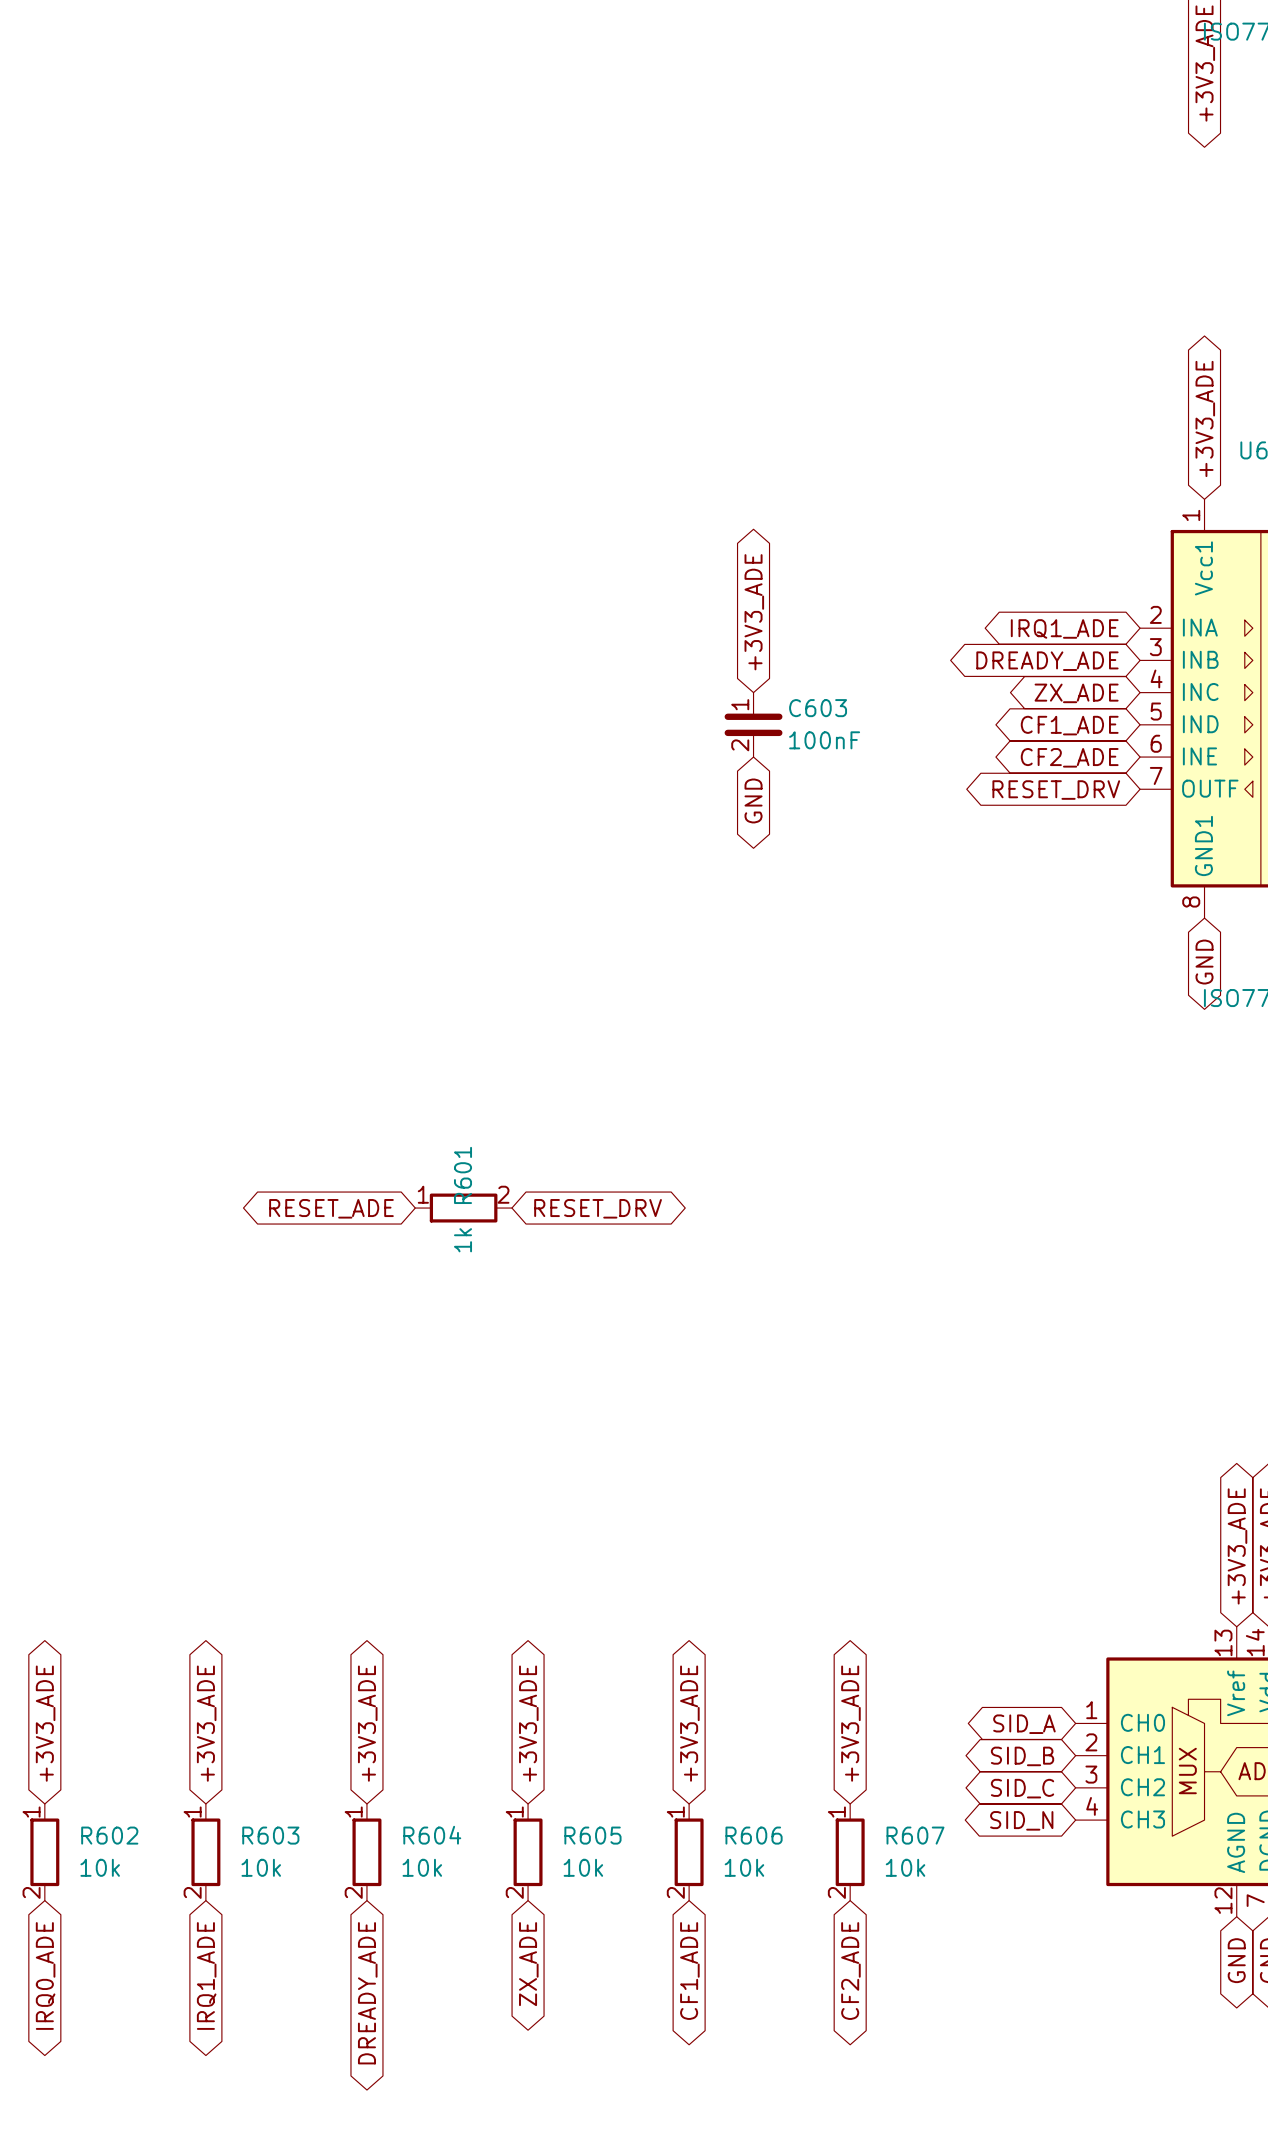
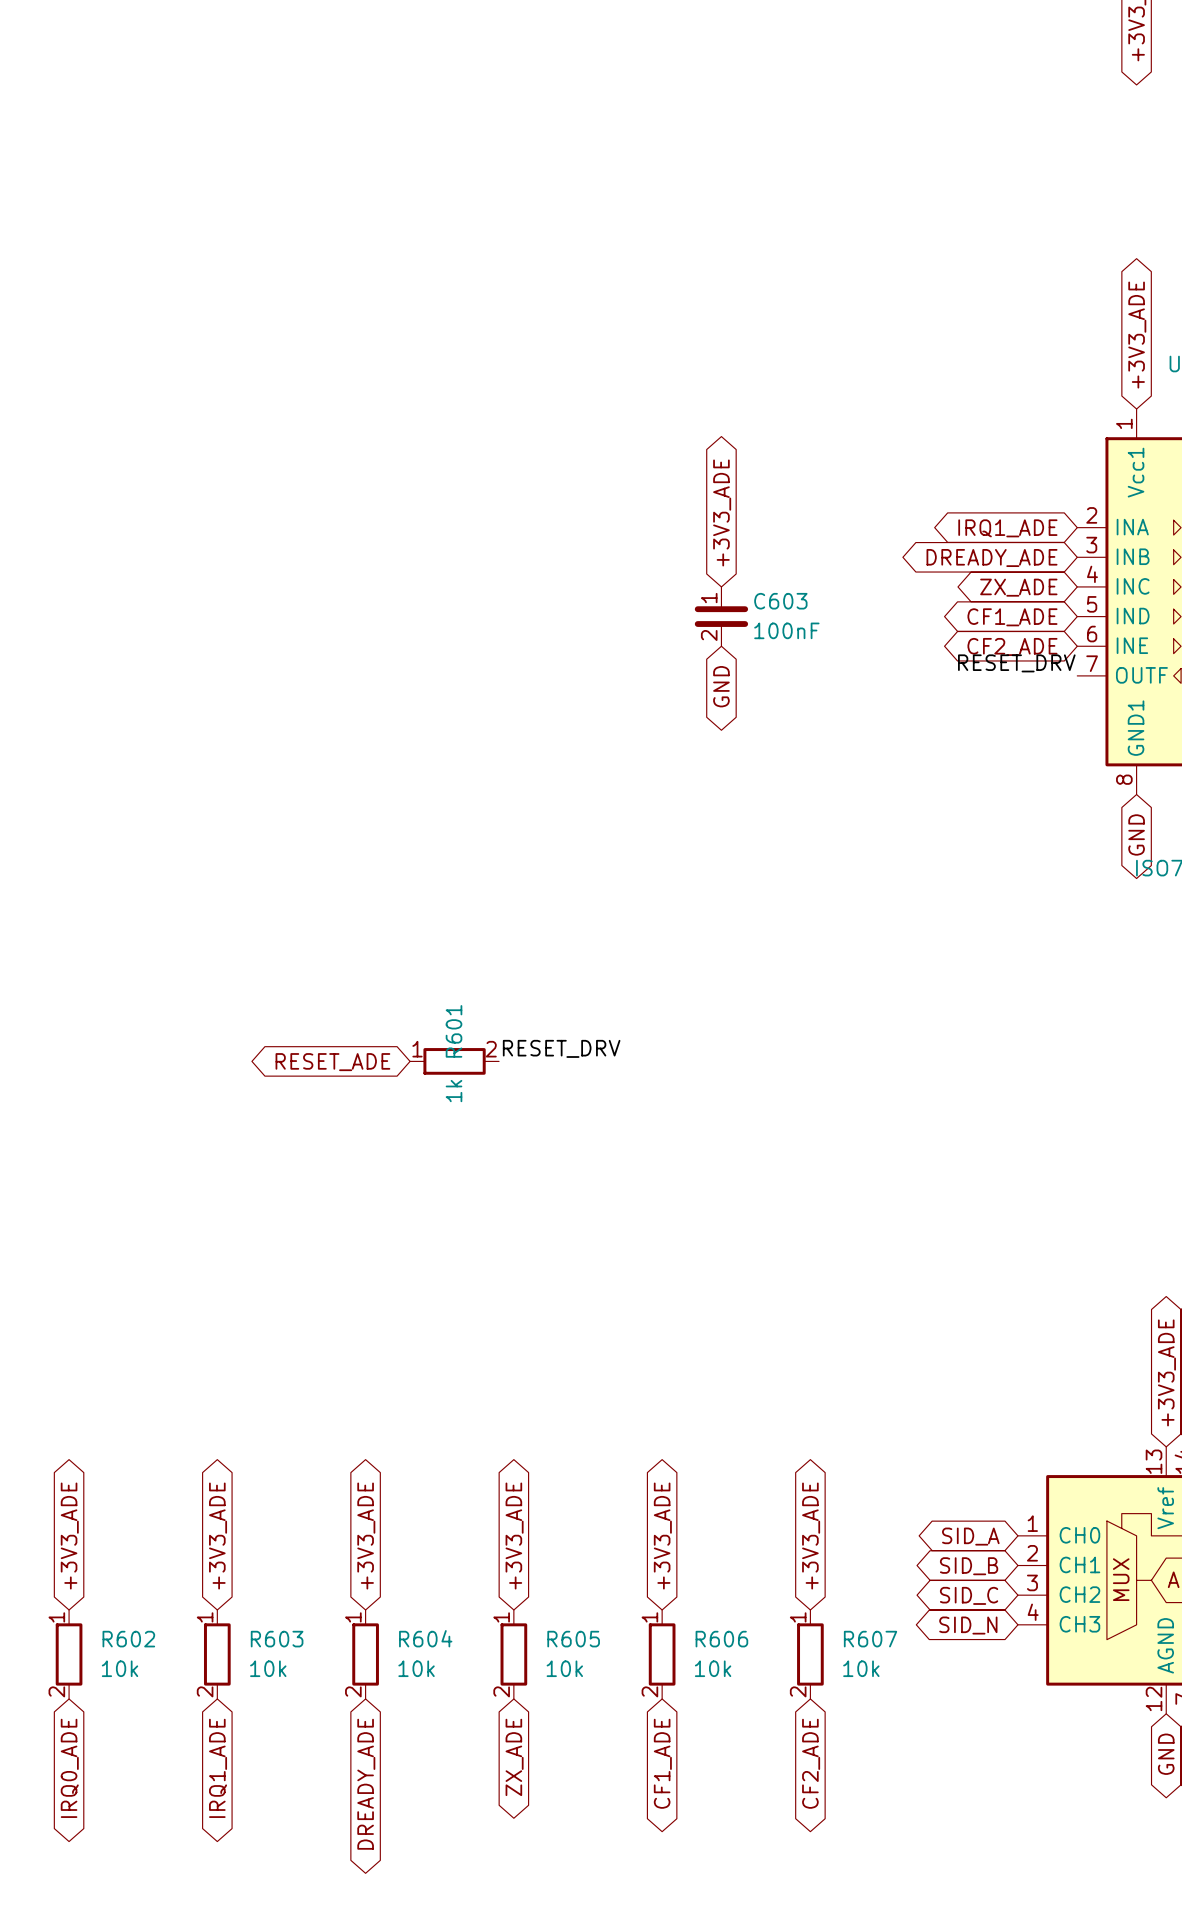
label: none -> RESET_DRV (1016, 663)
global label: RESET_DRV (1056, 790) -> none
label: none -> RESET_DRV (561, 1048)
global label: RESET_DRV (598, 1208) -> none

